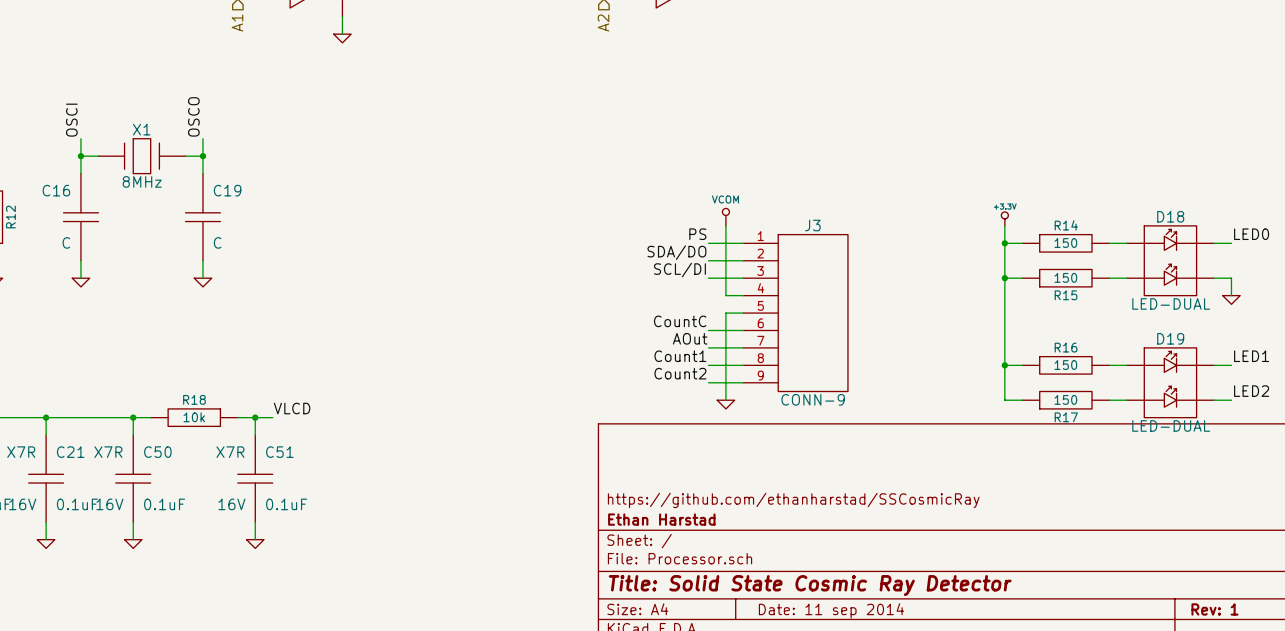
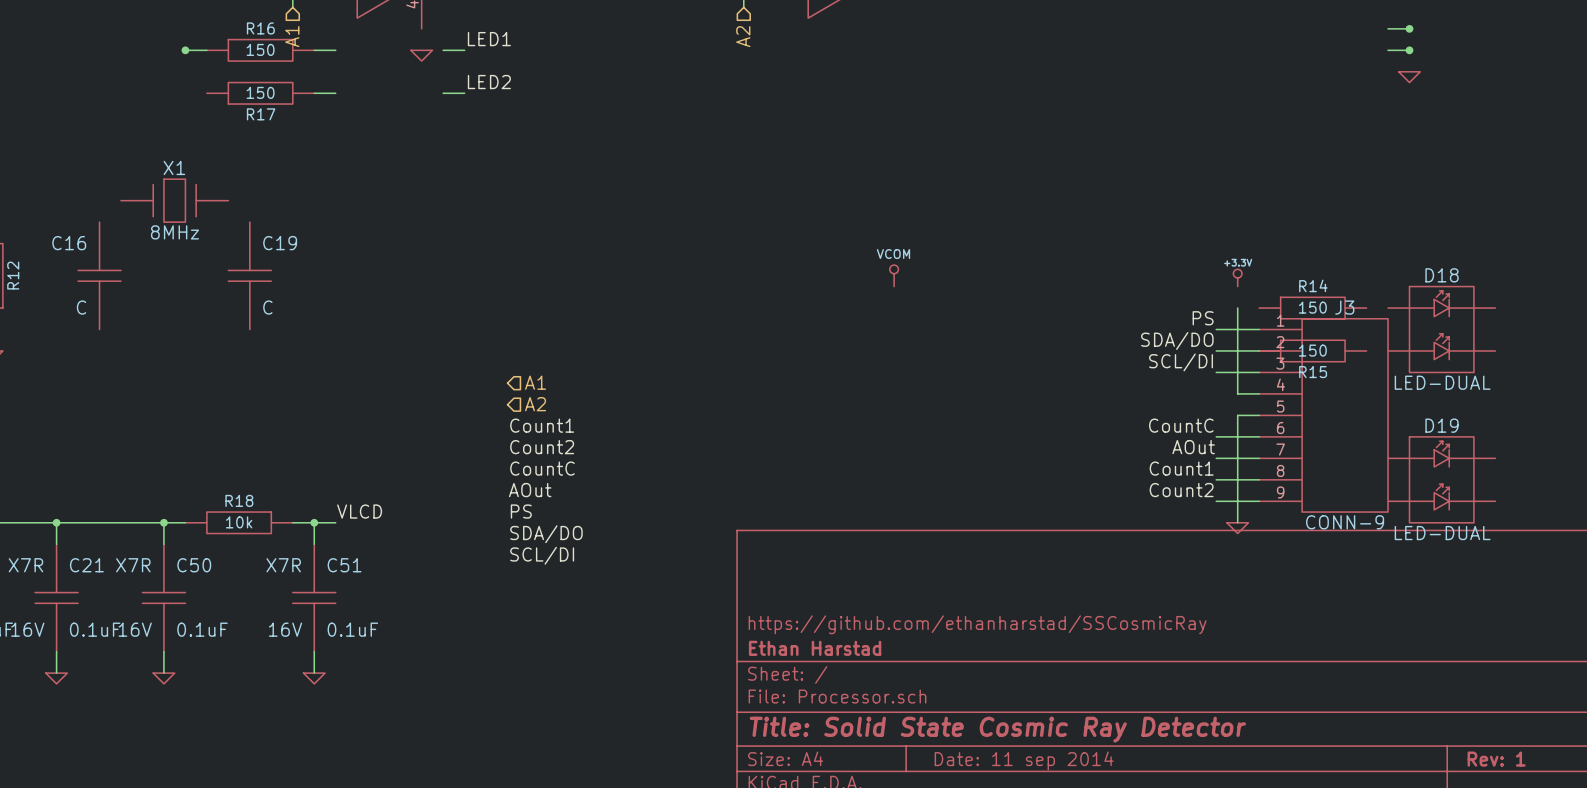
wire: (342, 16) (342, 34) -> none
wire: none -> (1388, 28) (1409, 28)
junction: none -> (1409, 28)
label: none -> LED1 (489, 39)
junction: none -> (185, 50)
wire: none -> (443, 50) (464, 50)
wire: none -> (1388, 50) (1409, 50)
junction: none -> (1409, 50)
power symbol: none -> (1409, 77)
label: none -> LED2 (489, 82)
wire: none -> (314, 93) (335, 93)
wire: none -> (443, 93) (464, 93)
label: OSCO (193, 116) -> none
label: OSCI (71, 120) -> none
wire: (80, 138) (80, 173) -> none
wire: (202, 138) (202, 173) -> none
wire: (80, 156) (98, 156) -> (185, 50) (206, 50)
junction: (80, 156) -> none
wire: (185, 156) (202, 156) -> (314, 50) (335, 50)
junction: (202, 156) -> none
wire: (725, 225) (725, 295) (743, 295) -> none
wire: (1004, 225) (1004, 243) (1022, 243) -> none
label: PS (697, 234) -> none
label: LED0 (1251, 234) -> none
wire: (708, 243) (743, 243) -> none
junction: (1004, 243) -> none
wire: (1109, 243) (1126, 243) -> none
wire: (1214, 243) (1231, 243) -> none
label: none -> PS (1203, 318)
label: SDA/DO (676, 252) -> none
wire: (80, 260) (80, 278) -> none
wire: (202, 260) (202, 278) -> none
wire: (708, 260) (743, 260) -> none
wire: none -> (1216, 329) (1259, 329)
label: SCL/DI (679, 270) -> none
label: none -> SDA/DO (1177, 340)
wire: (708, 278) (743, 278) -> none
junction: (1004, 278) -> none
wire: (1109, 278) (1126, 278) -> (1216, 350) (1237, 350)
wire: (1214, 278) (1231, 278) (1231, 295) -> none
power symbol: (80, 282) -> none
power symbol: (202, 282) -> none
label: none -> SCL/DI (1181, 362)
wire: none -> (1216, 372) (1259, 372)
power symbol: (1231, 299) -> none
hierarchical label: none -> A1 (535, 382)
wire: (743, 313) (725, 313) (725, 400) -> none
J3 position: (795, 313) -> (1323, 415)
wire: (1004, 313) (1004, 330) -> (1237, 393) (1259, 393)
hierarchical label: none -> A2 (535, 404)
label: CountC (680, 321) -> none
wire: (708, 330) (743, 330) -> none
label: none -> Count1 (542, 425)
label: AOut (690, 338) -> none
label: none -> CountC (1181, 425)
wire: (708, 347) (743, 347) -> none
wire: none -> (1216, 436) (1259, 436)
label: none -> Count2 (542, 447)
label: Count1 (680, 356) -> none
label: none -> AOut (1193, 447)
label: LED1 (1251, 356) -> none
wire: (708, 365) (743, 365) -> none
junction: (1004, 365) -> none
R16 position: (1065, 365) -> (260, 50)
wire: (1109, 365) (1126, 365) -> (1216, 458) (1237, 458)
wire: (1214, 365) (1231, 365) -> none
label: none -> CountC (542, 468)
label: Count2 (680, 373) -> none
label: none -> Count1 (1181, 468)
wire: (708, 382) (743, 382) -> none
wire: none -> (1216, 479) (1259, 479)
label: none -> AOut (530, 490)
label: none -> Count2 (1181, 490)
label: LED2 (1251, 391) -> none
wire: none -> (1216, 501) (1237, 501) (1237, 522)
R17 position: (1065, 400) -> (260, 93)
wire: (1109, 400) (1126, 400) -> (1237, 415) (1259, 415)
wire: (1214, 400) (1231, 400) -> none
power symbol: (725, 404) -> none
label: none -> PS (521, 511)
power symbol: none -> (1237, 528)
label: none -> SDA/DO (546, 534)
label: none -> SCL/DI (542, 555)

